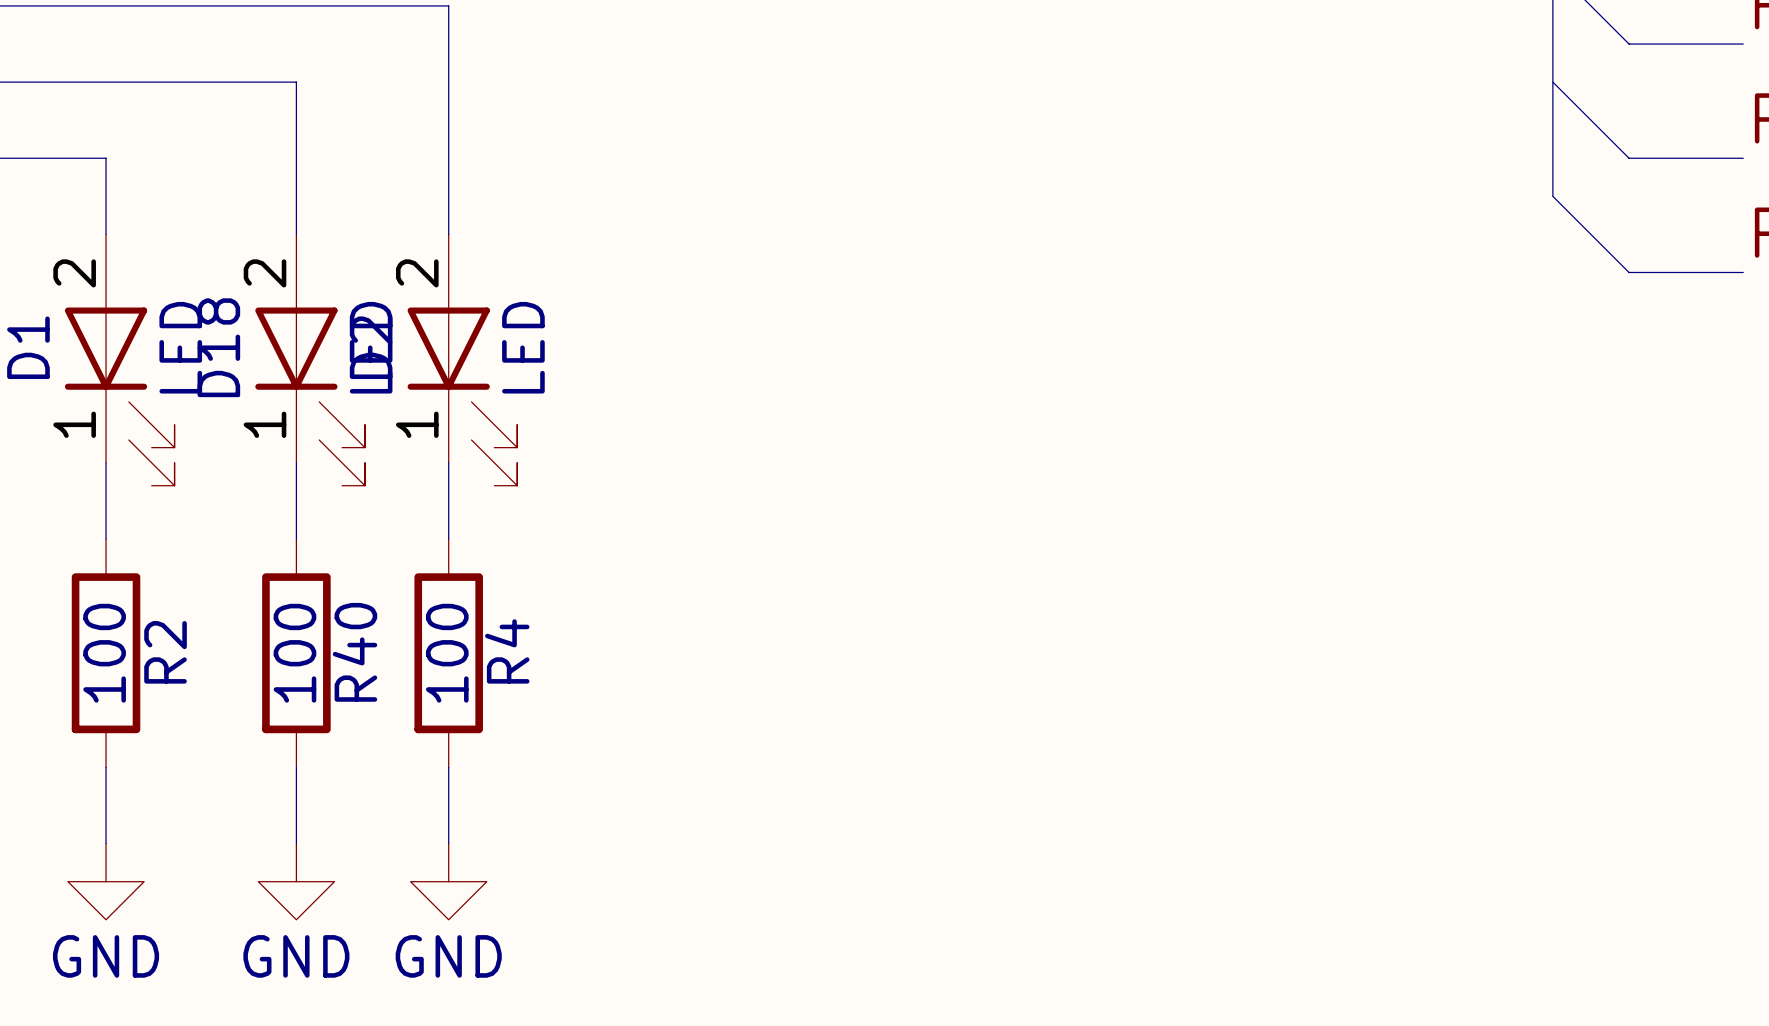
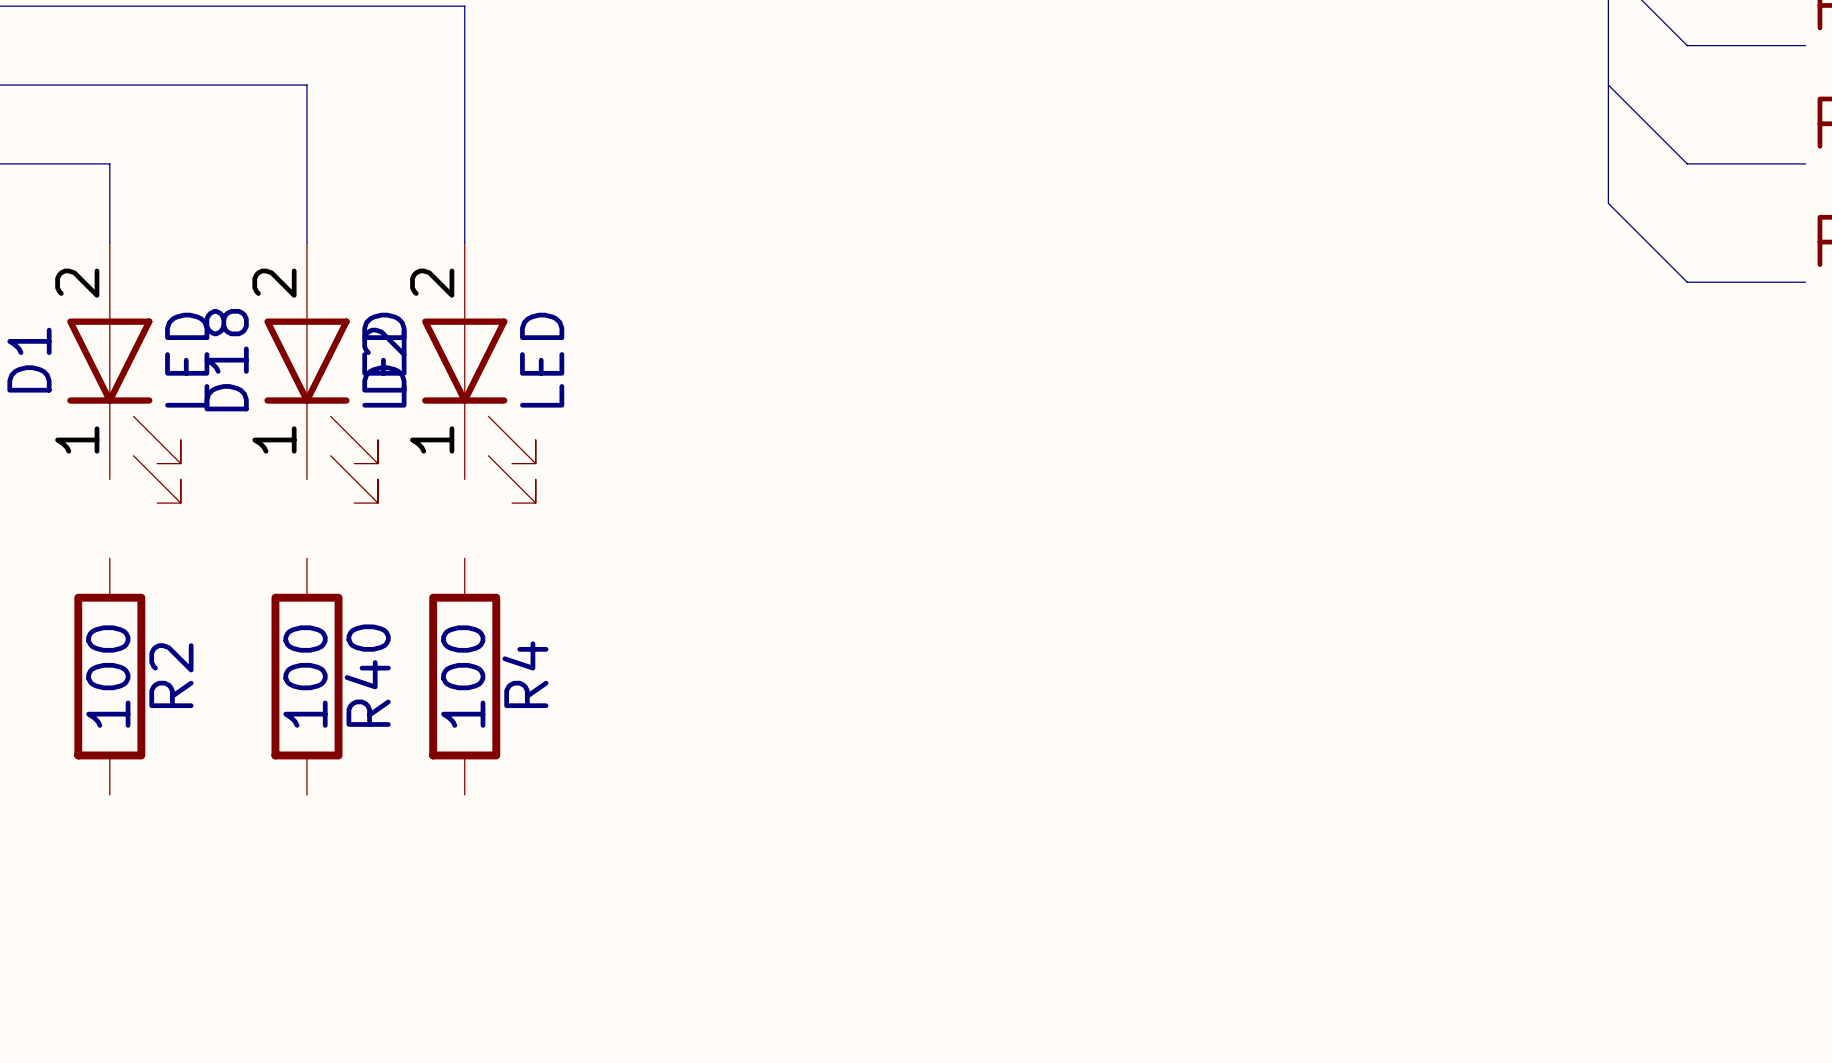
wire: (106, 462) (106, 539) -> none
wire: (296, 462) (296, 539) -> none
wire: (448, 462) (448, 539) -> none
wire: (106, 767) (106, 843) -> none
wire: (296, 767) (296, 843) -> none
wire: (448, 767) (448, 843) -> none
power symbol: GND (106, 881) -> none
power symbol: GND (296, 881) -> none
power symbol: GND (448, 881) -> none

